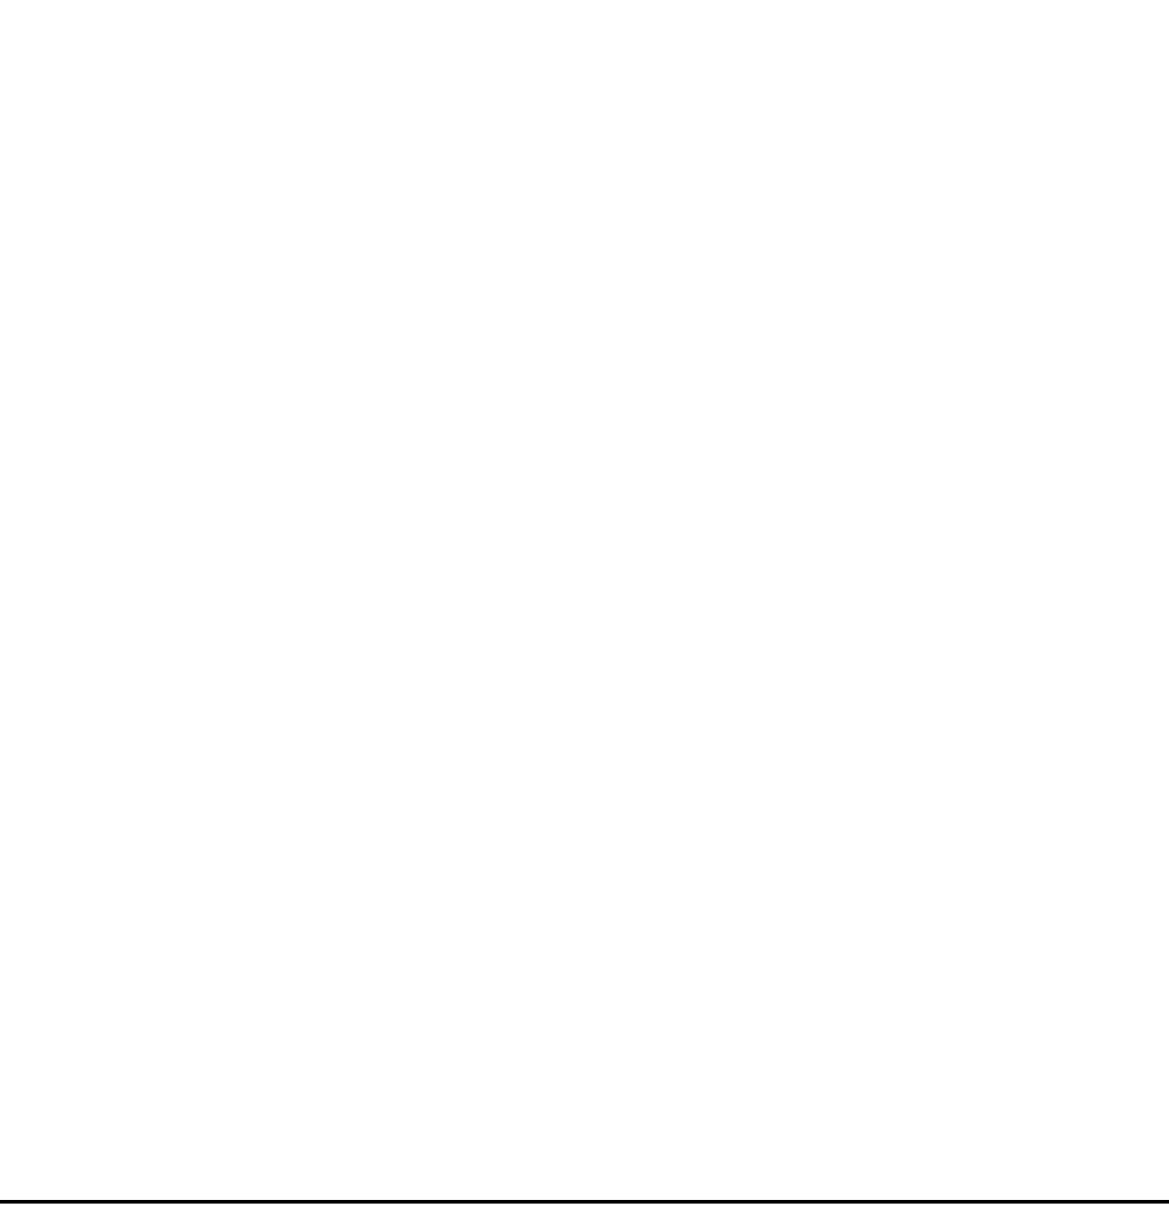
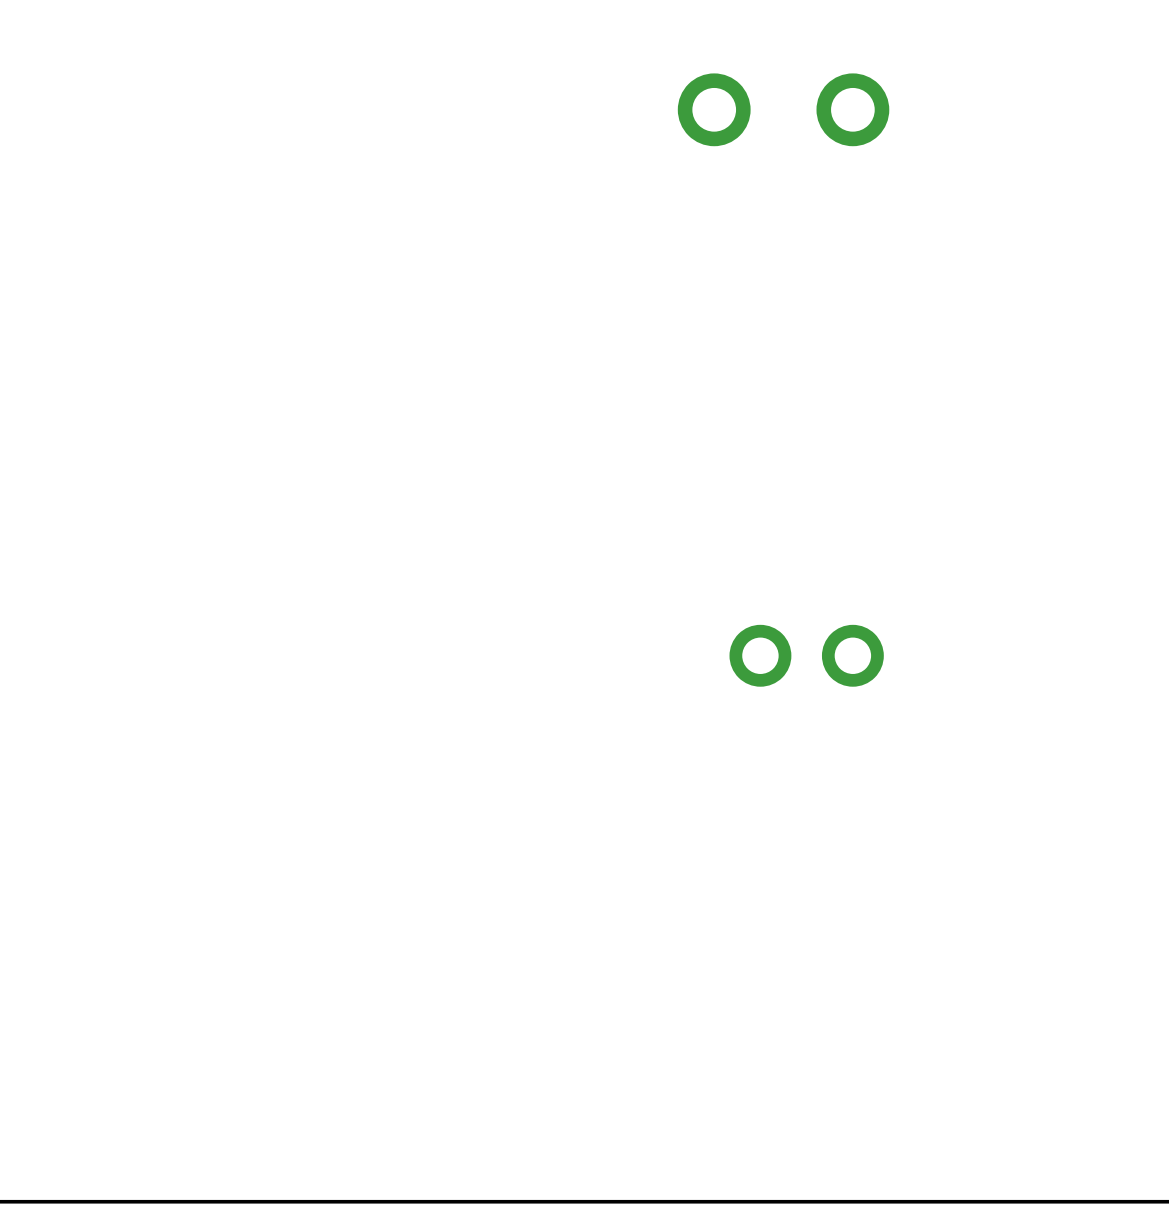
part: none -> (783, 109)
part: none -> (806, 655)

